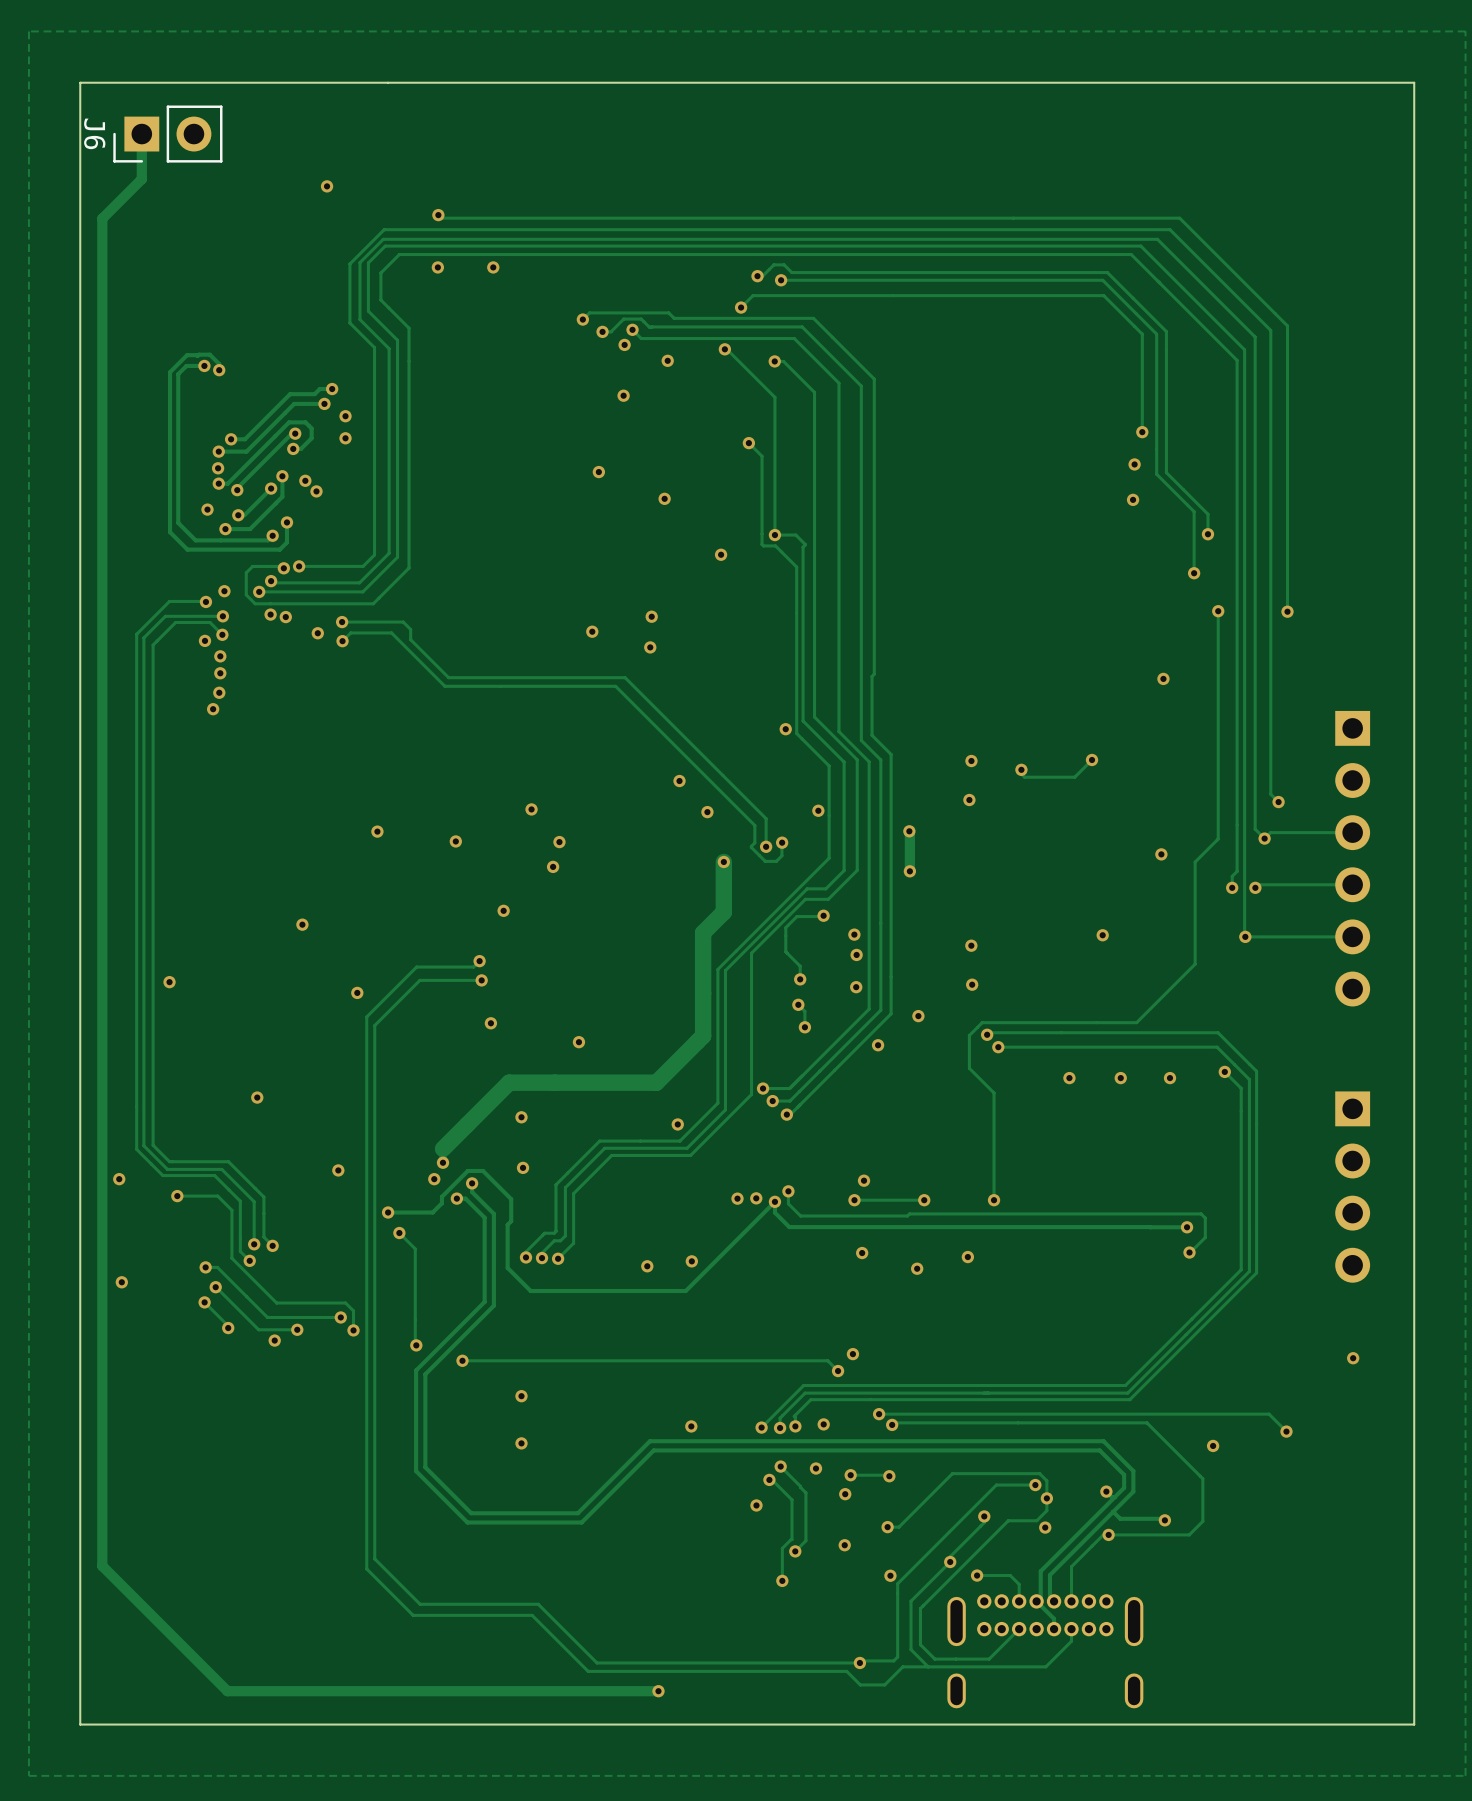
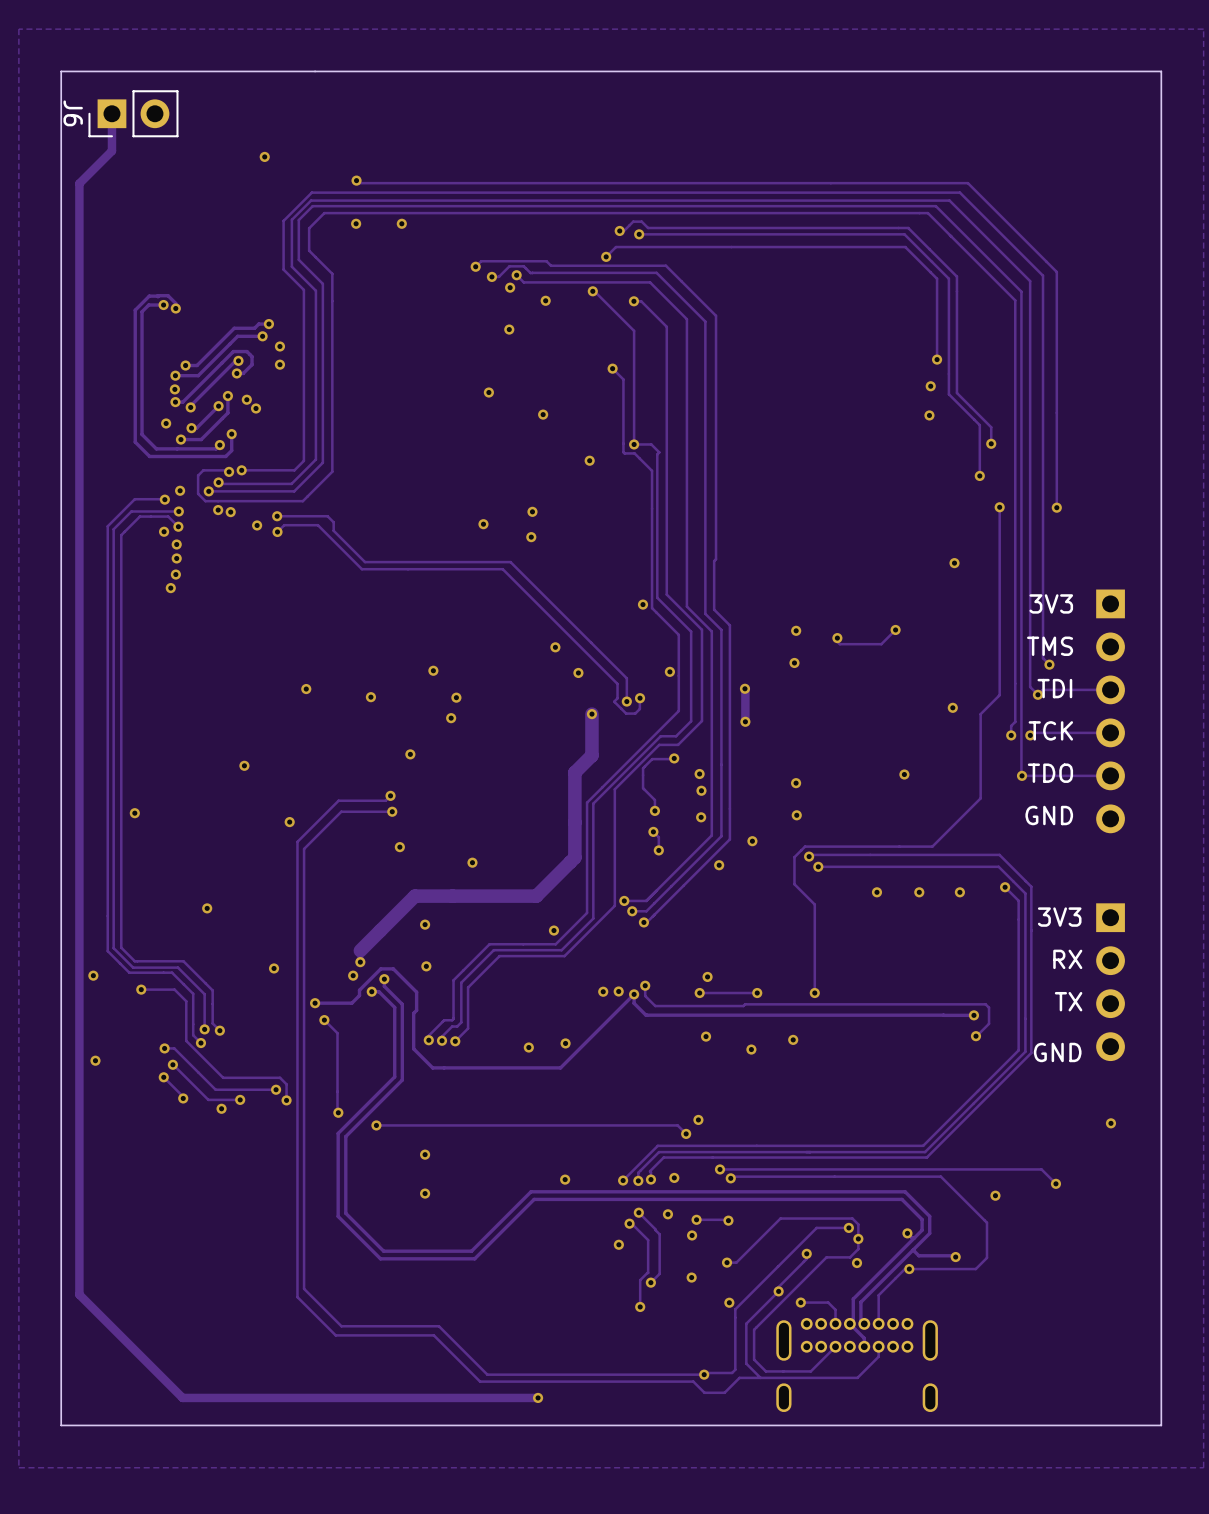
text: none -> 3V3 (1051, 603)
text: none -> TMS (1050, 646)
text: none -> TDI (1054, 688)
text: none -> TCK (1050, 730)
text: none -> TDO (1050, 773)
text: none -> GND (1049, 815)
text: none -> 3V3 (1059, 917)
text: none -> RX (1067, 959)
text: none -> TX (1068, 1001)
text: none -> GND (1057, 1052)

